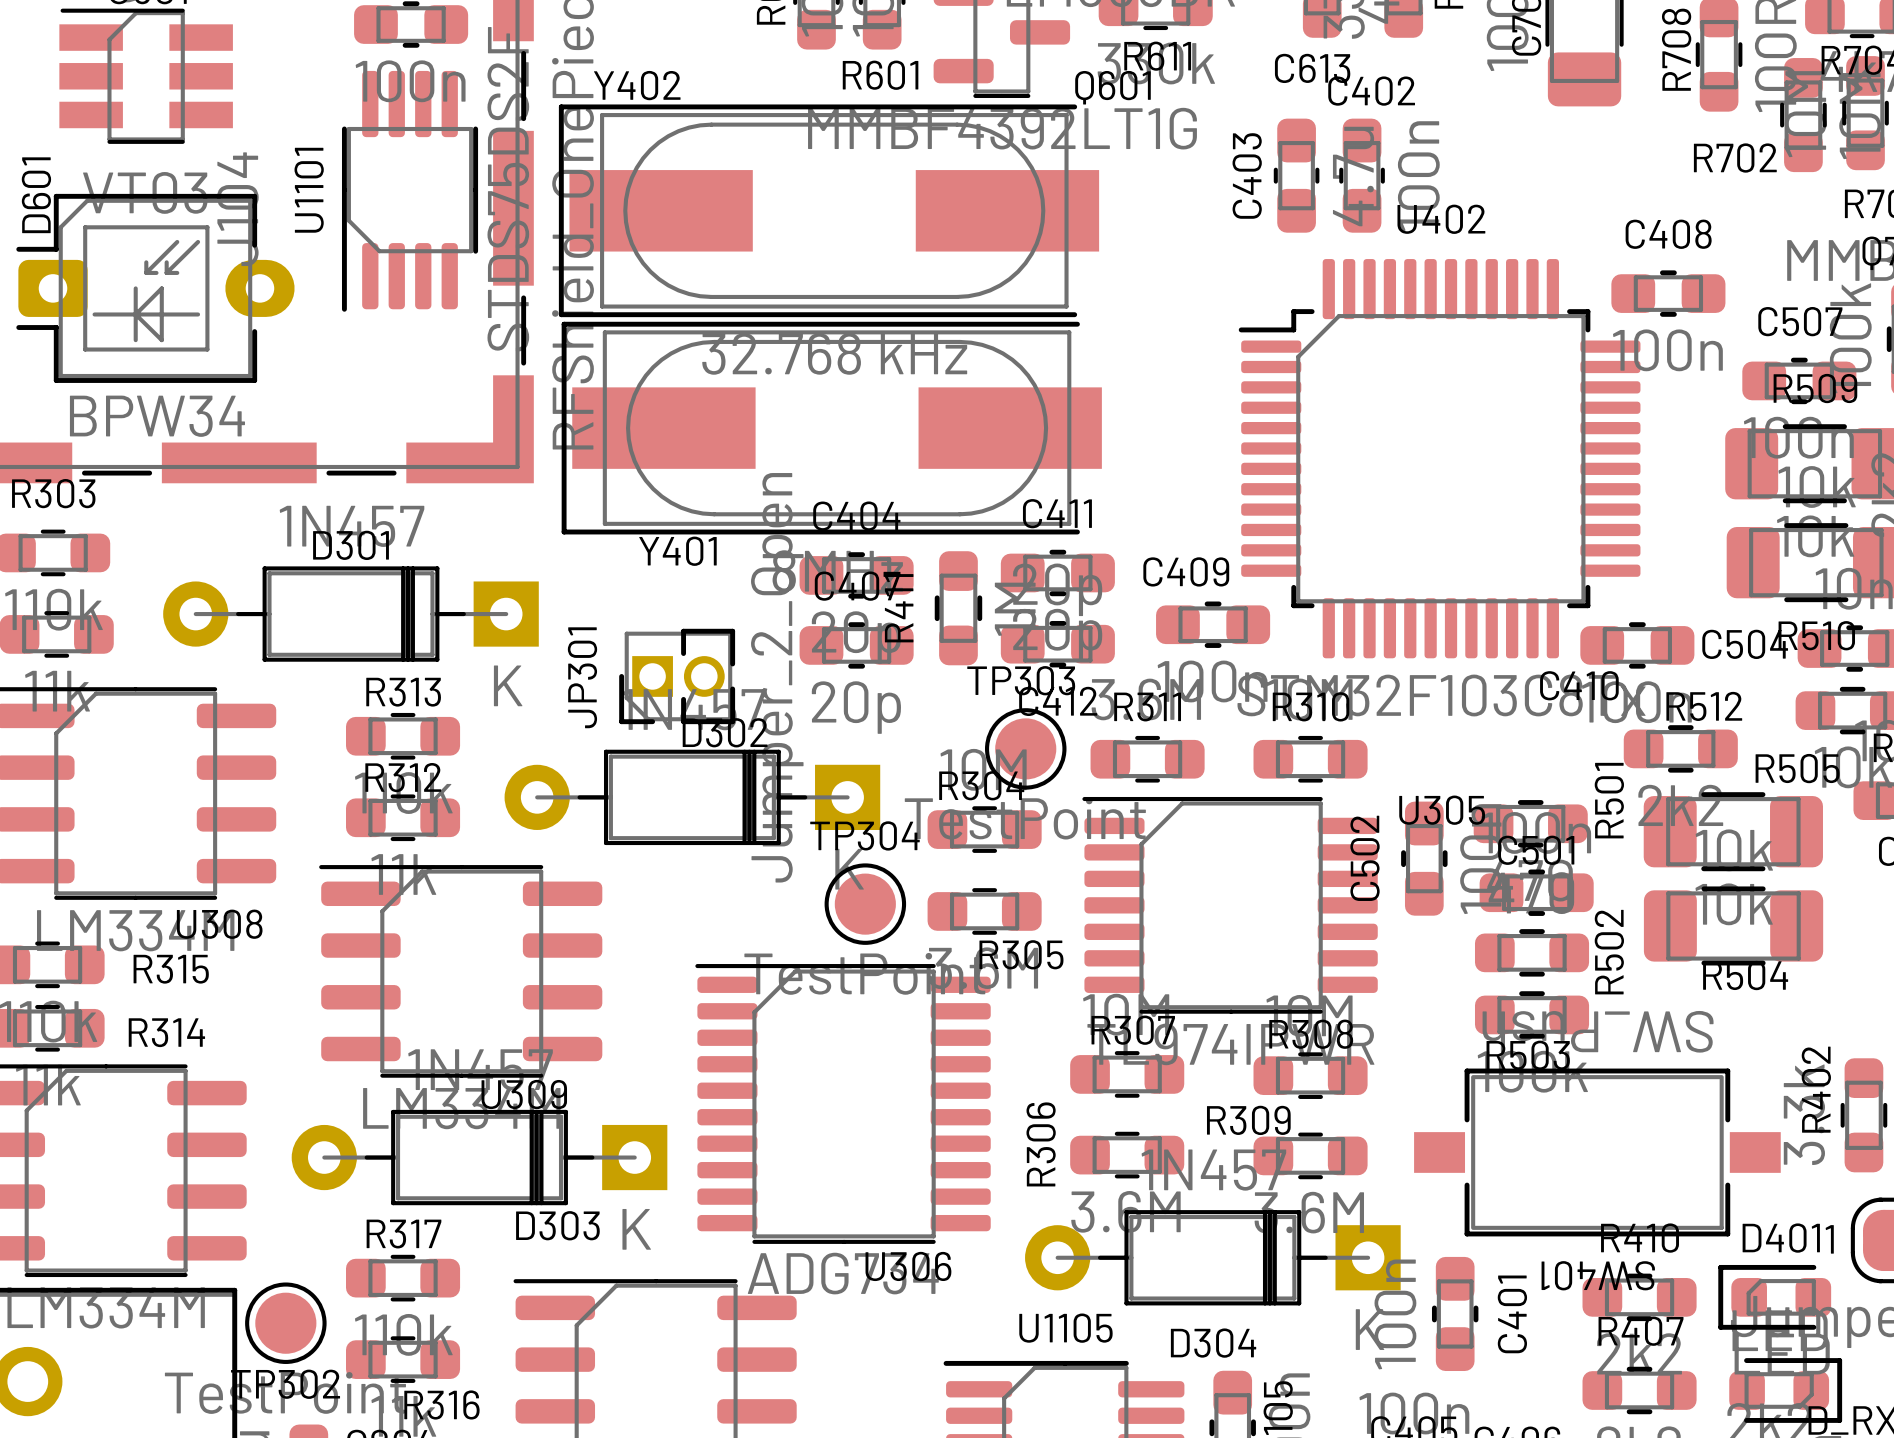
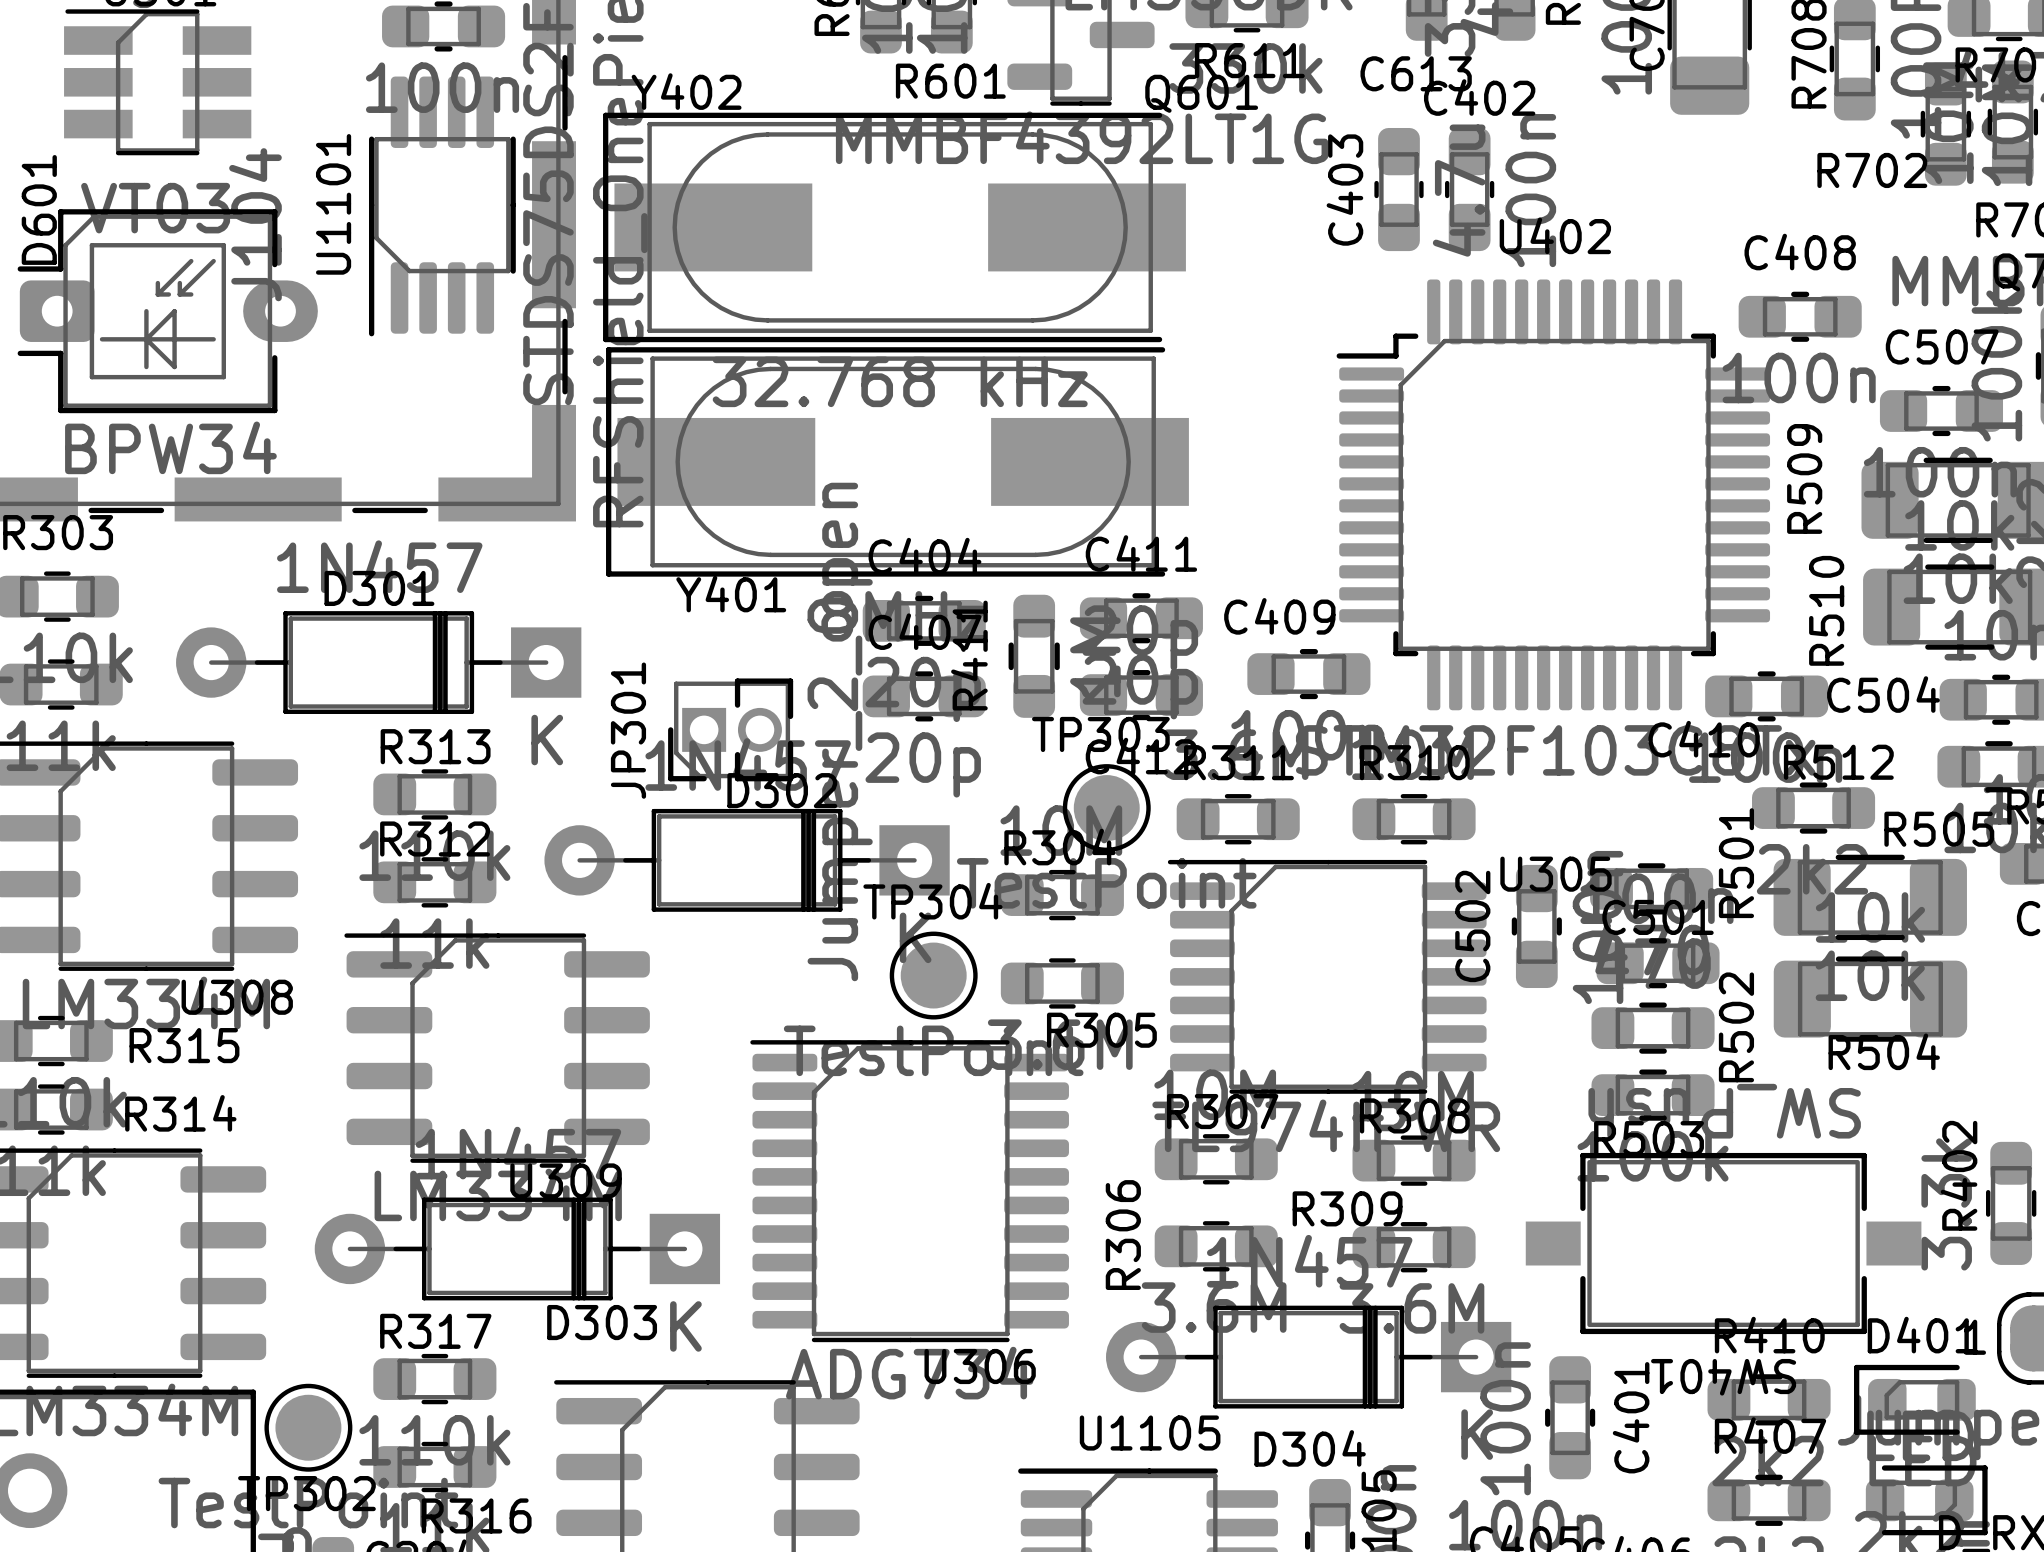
R509 name rotation: 0° (1815, 388) -> 90° counterclockwise (1804, 478)
R509 name position: R509 (1815, 388) -> R509 (1804, 478)
R510 name rotation: 0° (1816, 635) -> 90° counterclockwise (1826, 610)
R510 name position: R510 (1816, 635) -> R510 (1826, 610)

